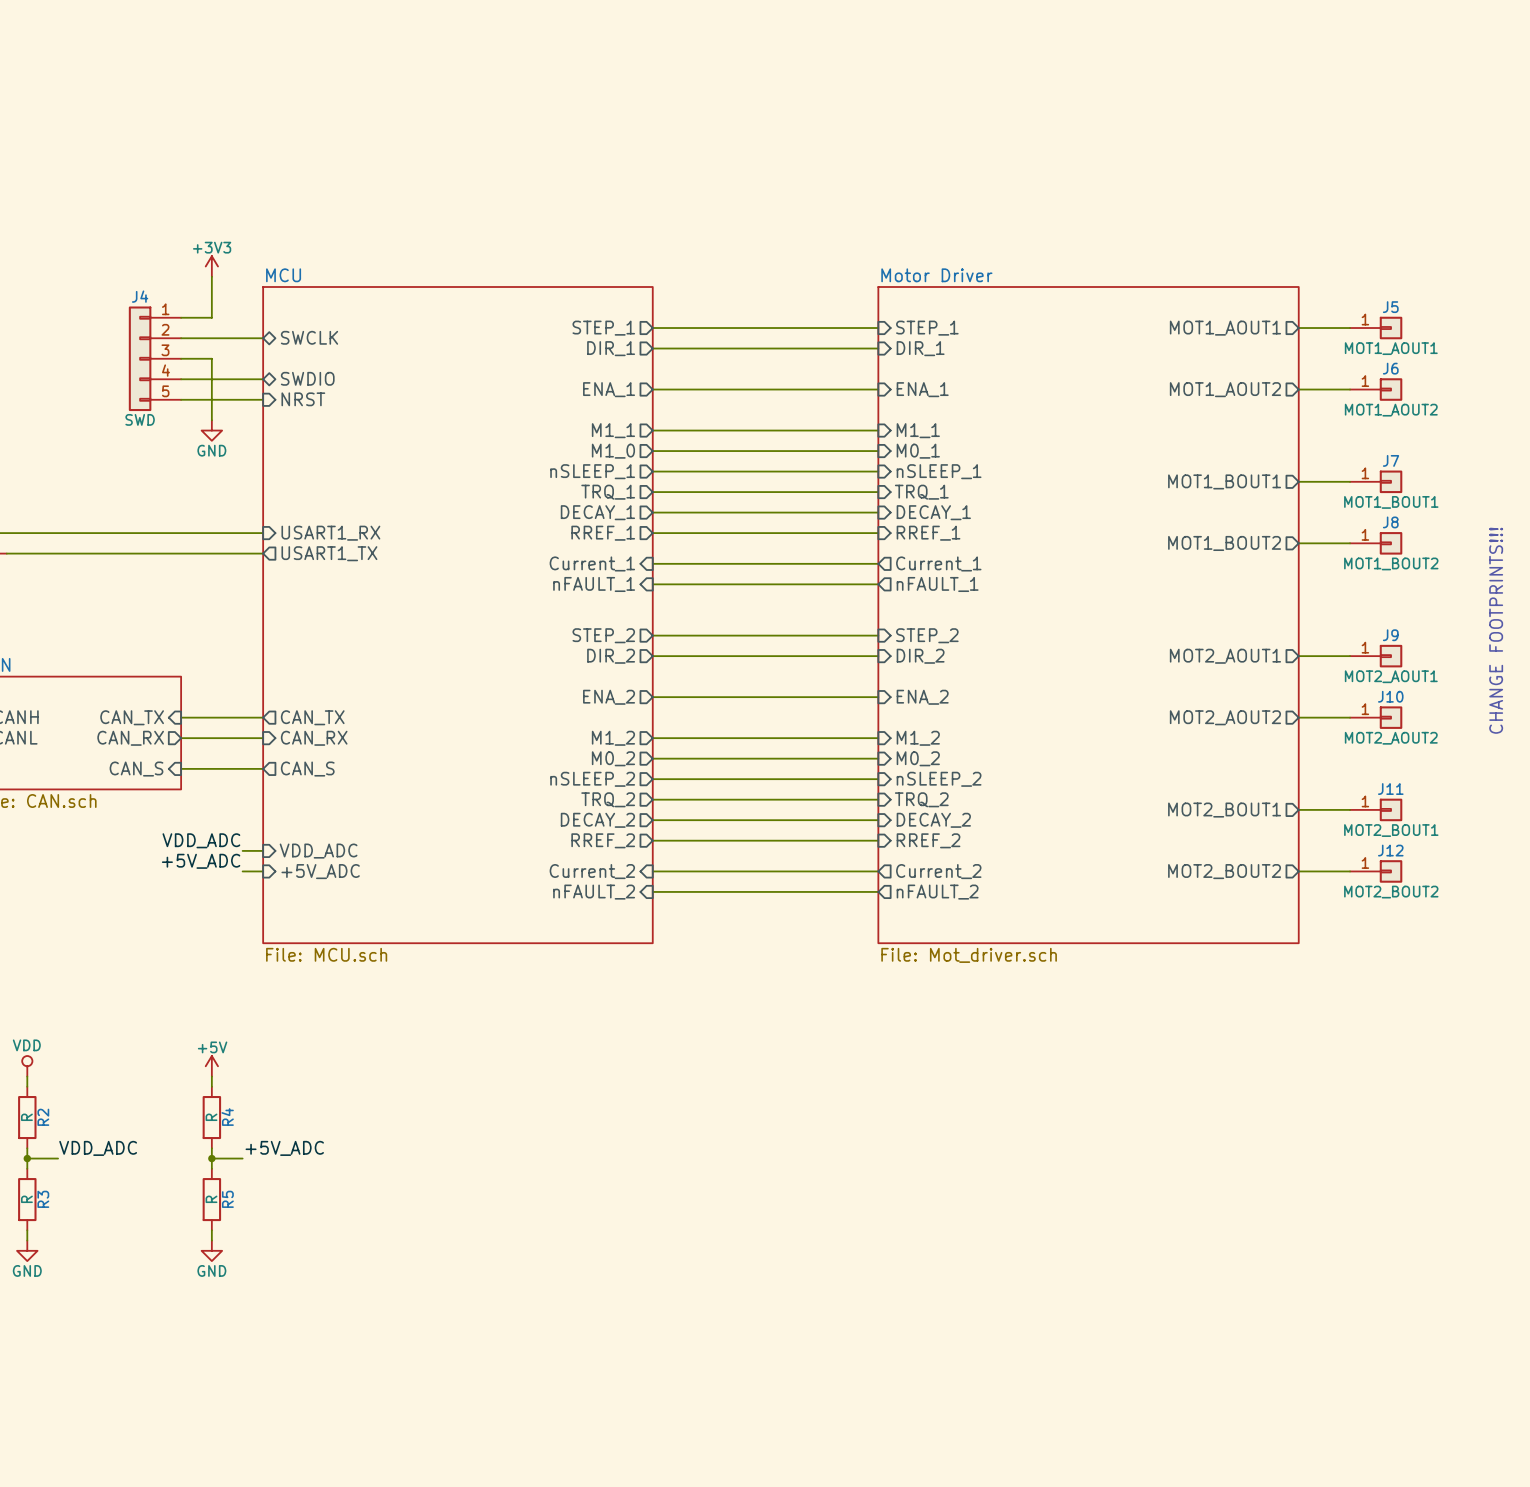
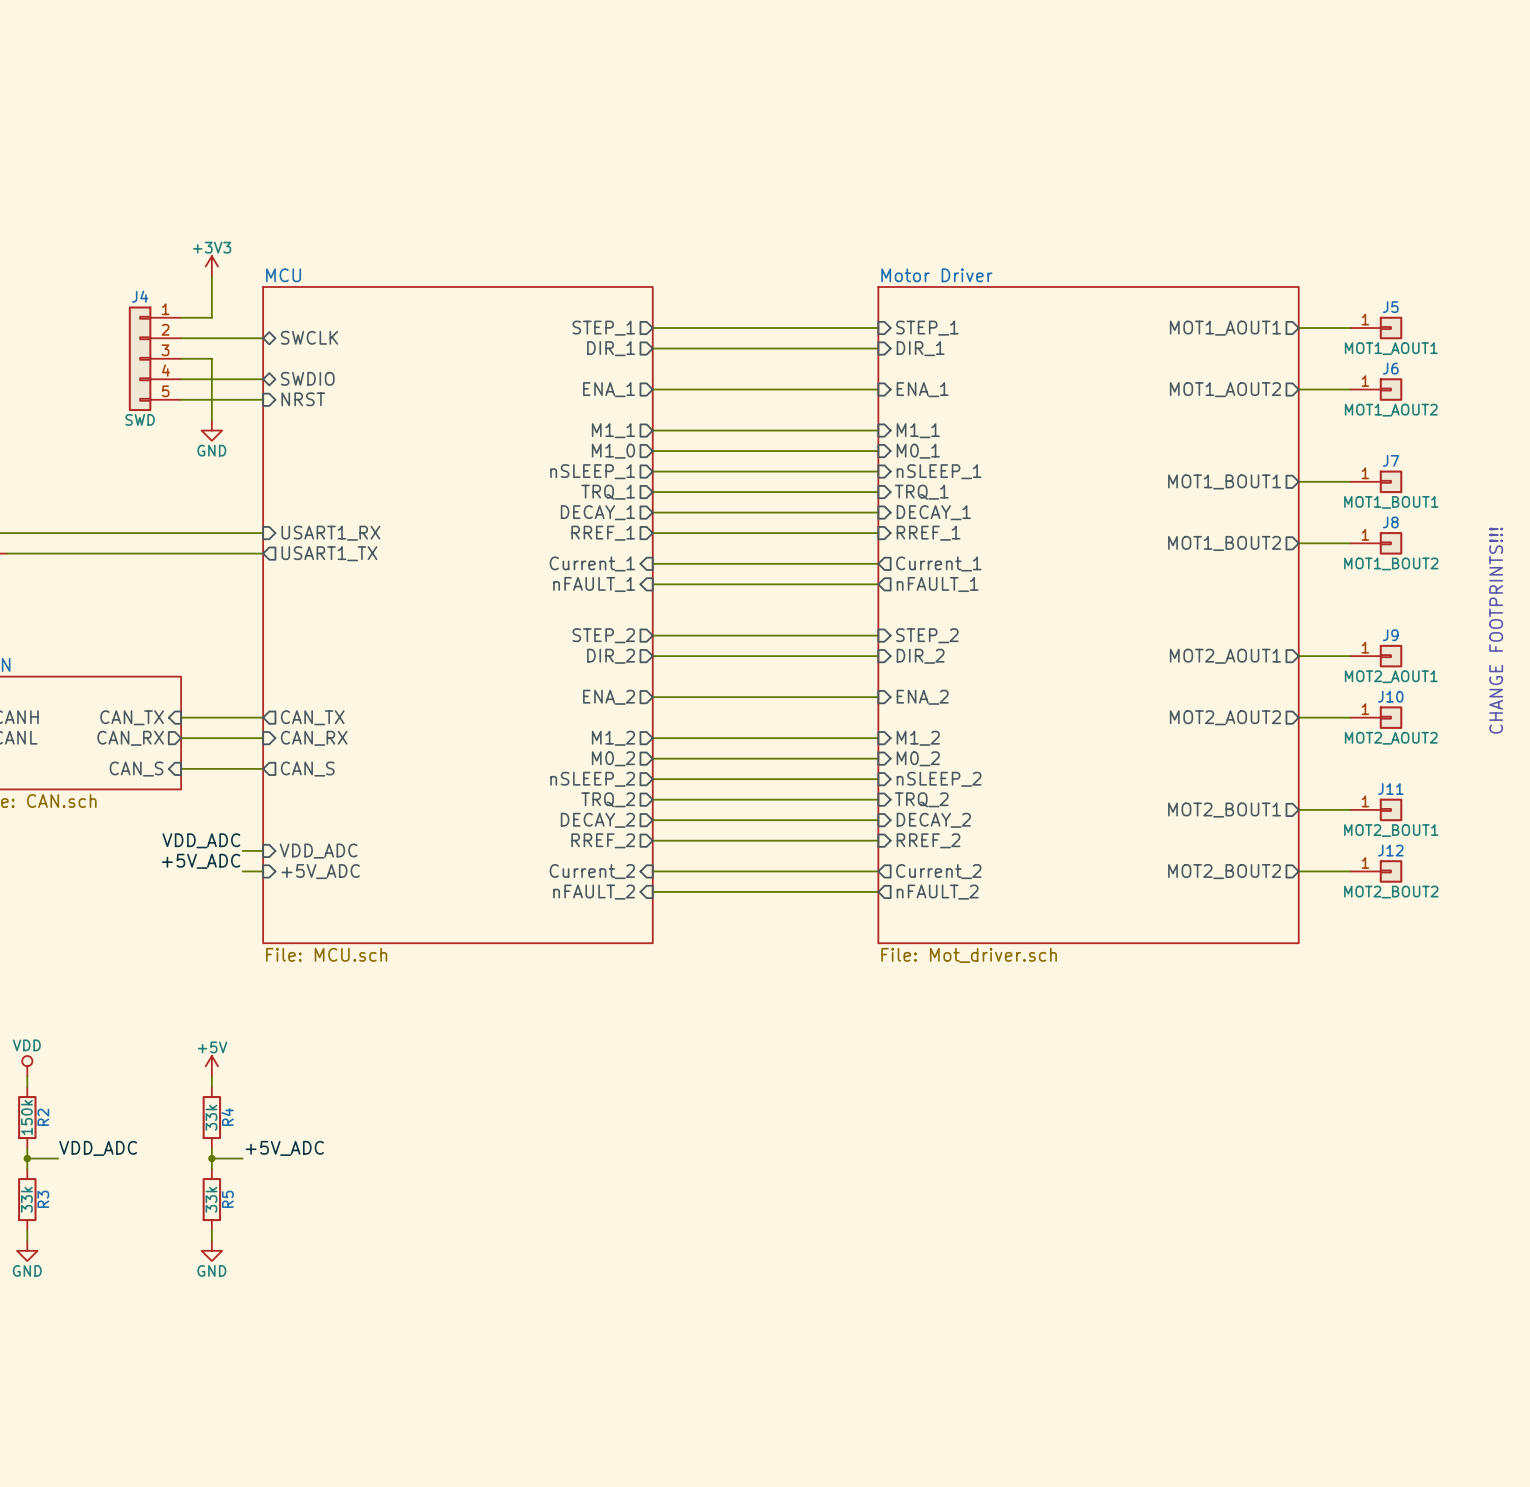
R2 value: R (26, 1117) -> 150k (26, 1117)
R4 value: R (211, 1117) -> 33k (211, 1117)
R3 value: R (26, 1199) -> 33k (26, 1199)
R5 value: R (211, 1199) -> 33k (211, 1199)

